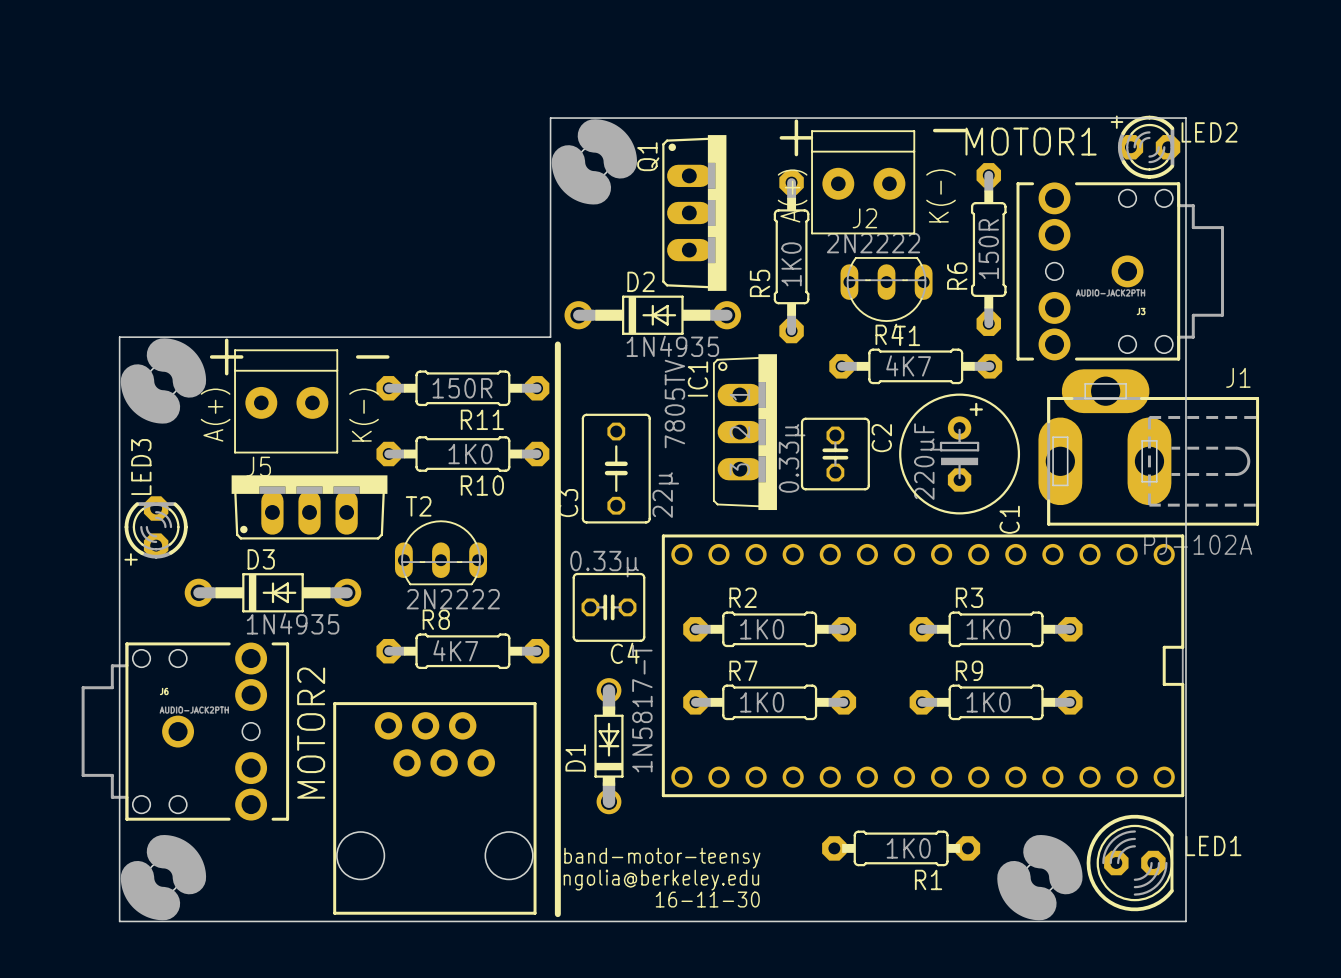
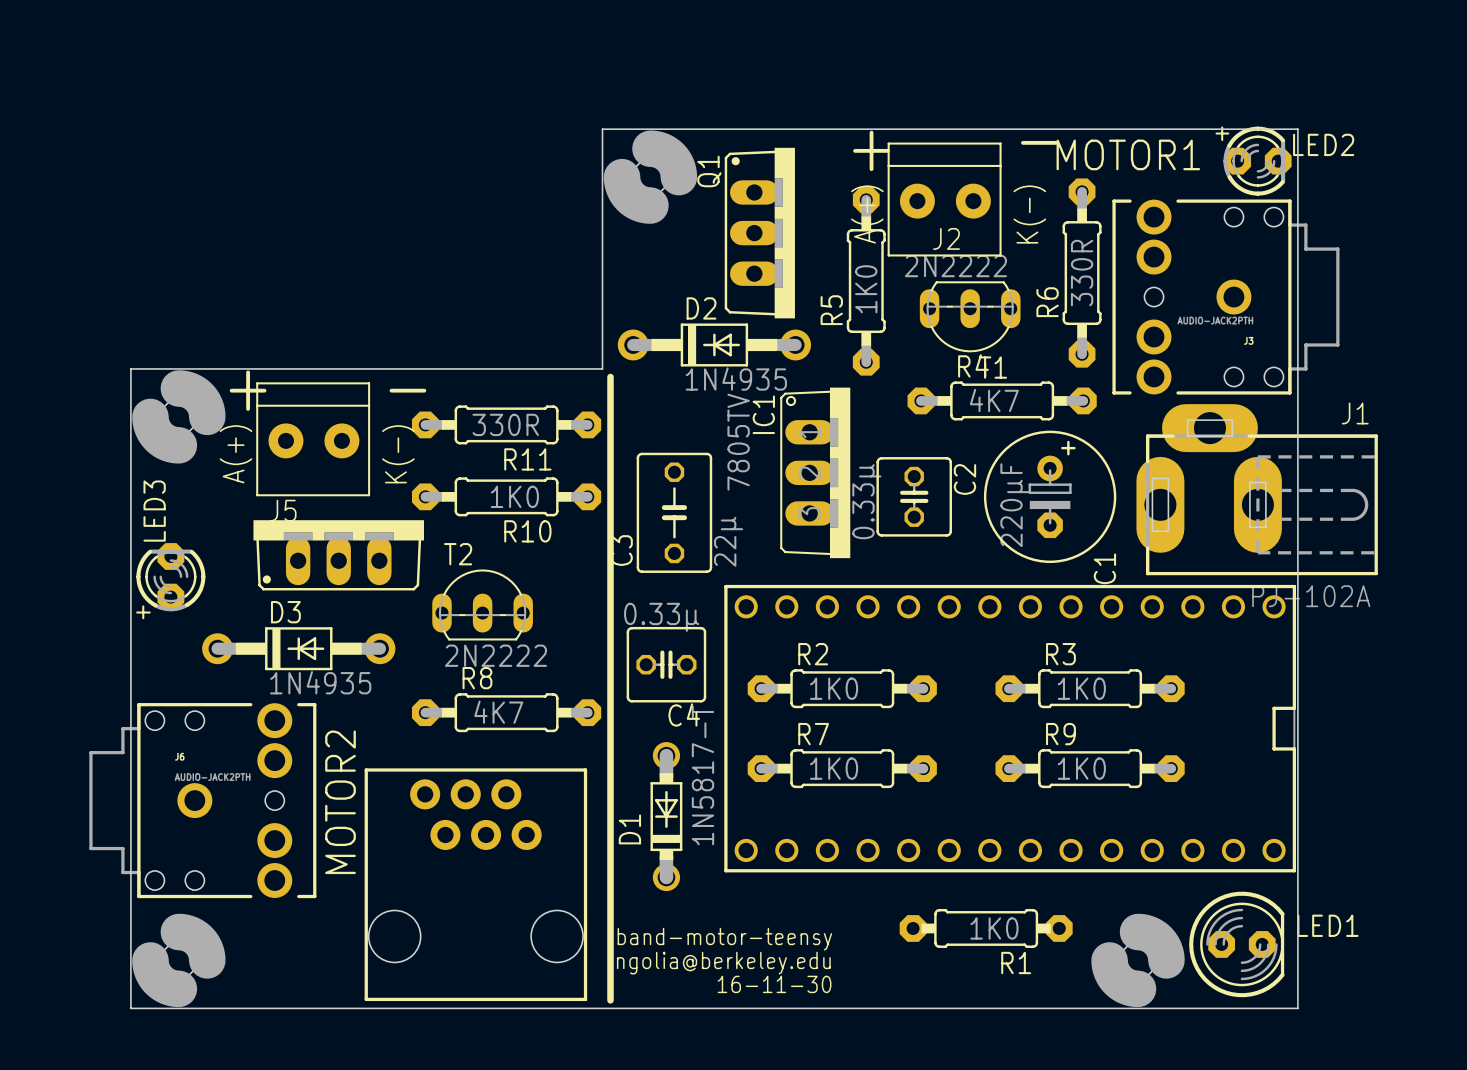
R6 value: 150R (988, 249) -> 330R (1082, 273)
R11 value: 150R (462, 388) -> 330R (505, 424)

